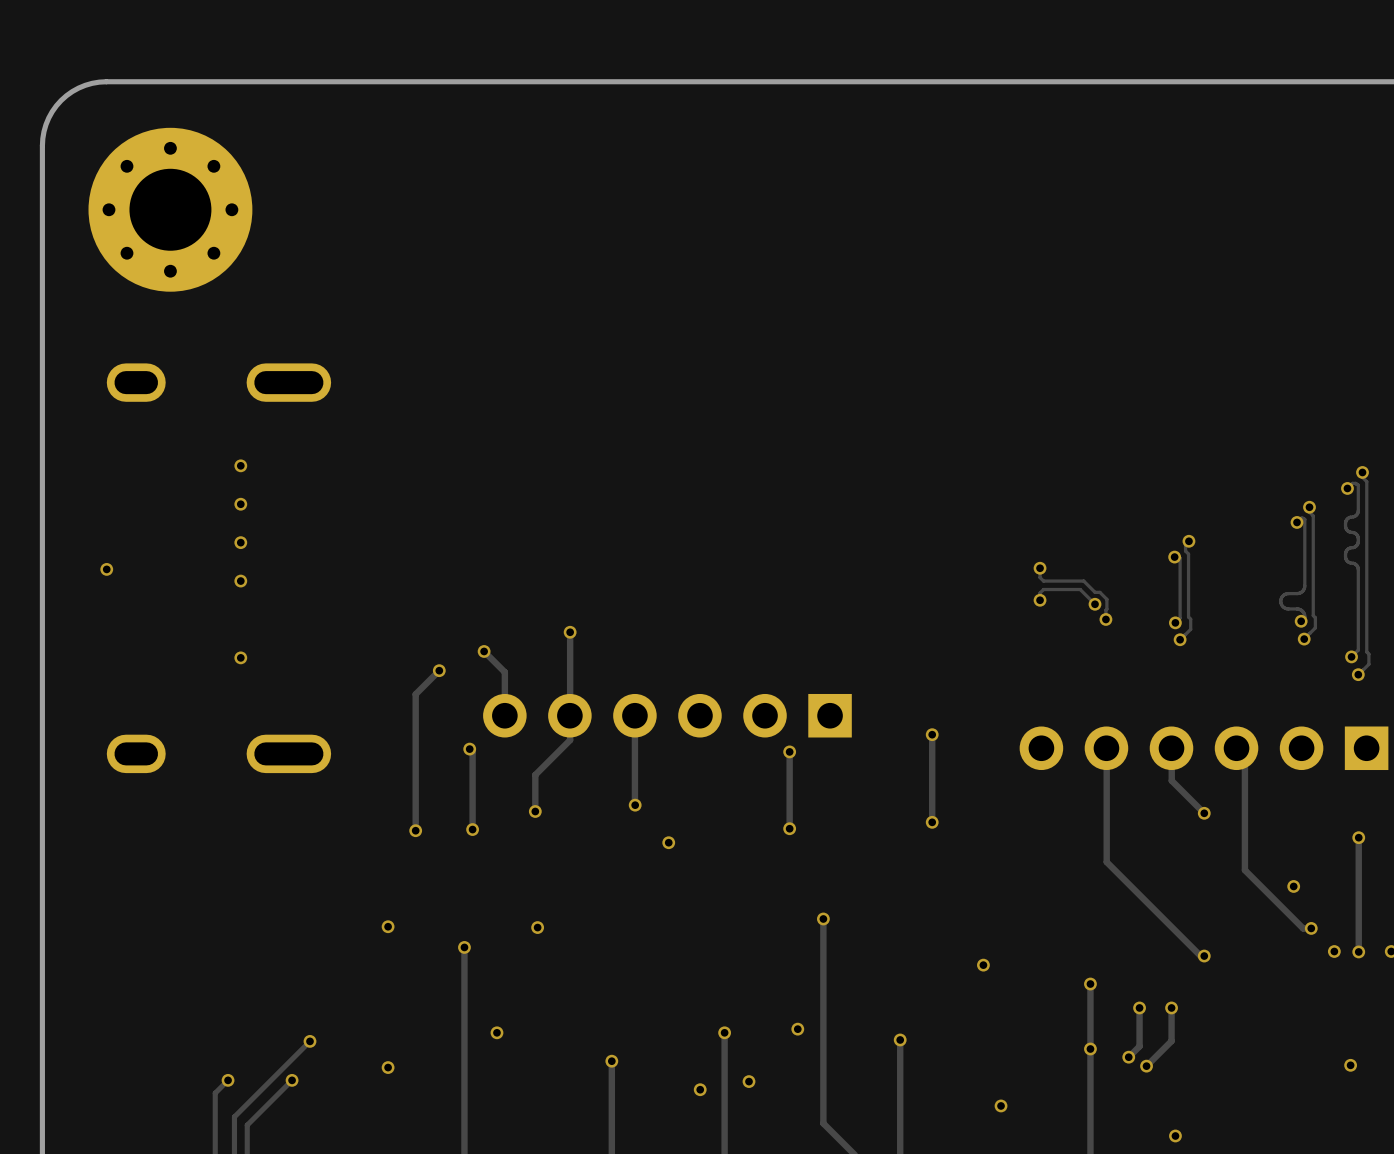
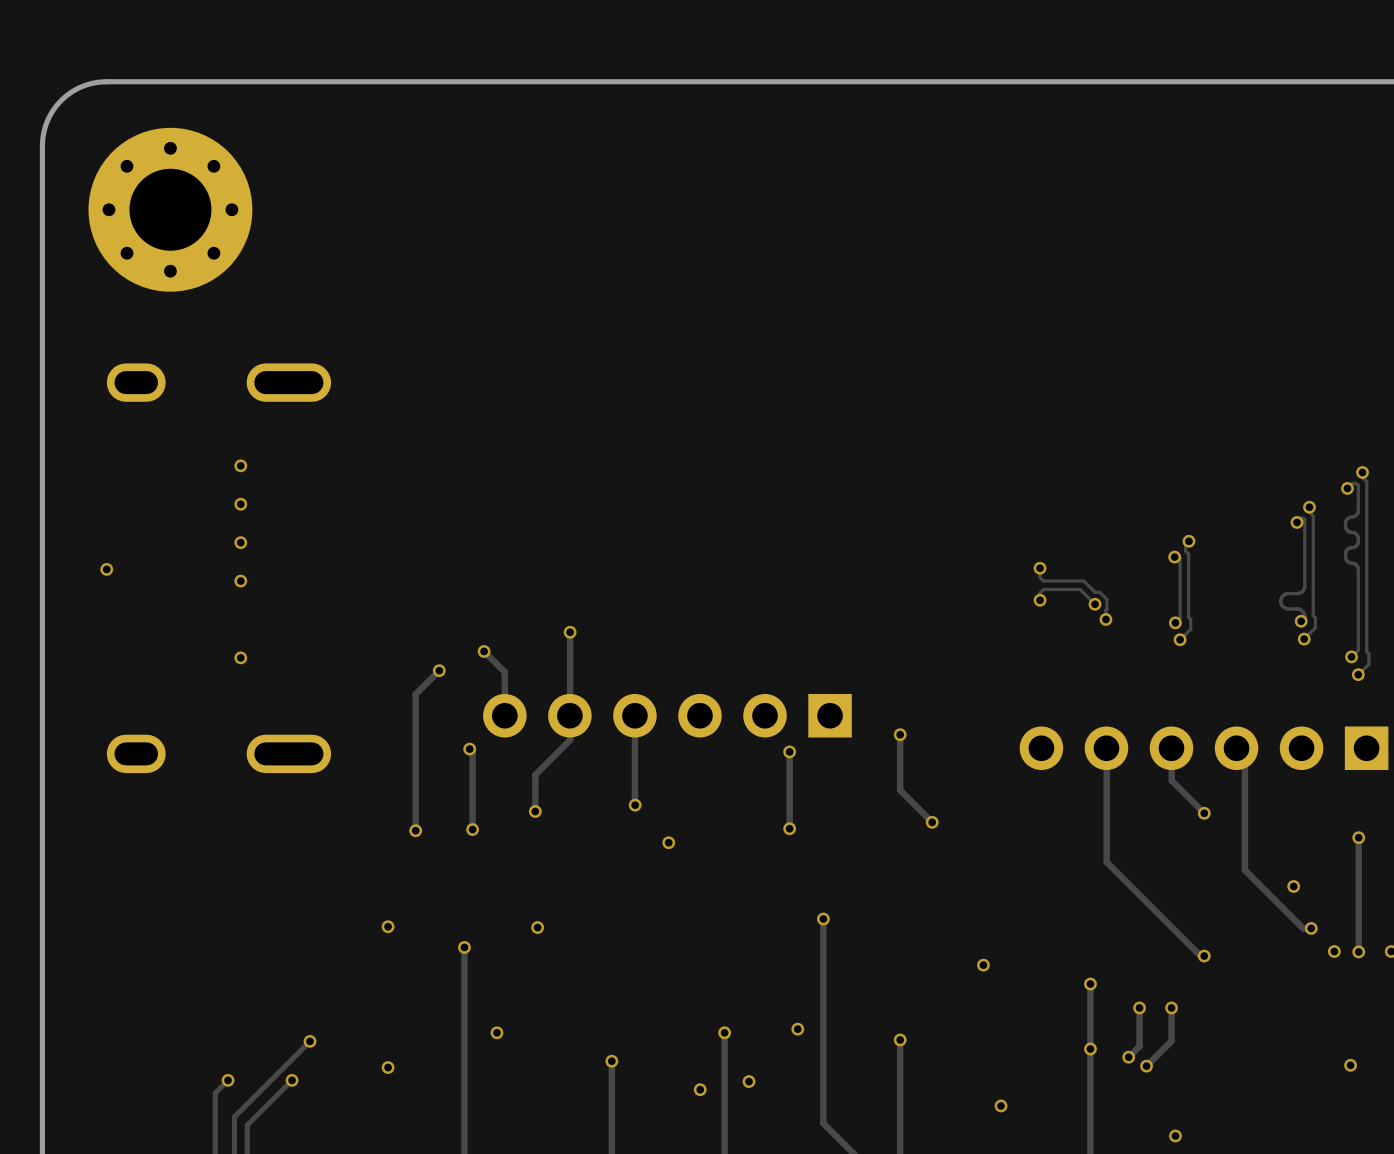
track: (932, 734) (932, 822) -> (900, 734) (900, 790) (932, 822)
via position: (932, 734) -> (900, 734)

